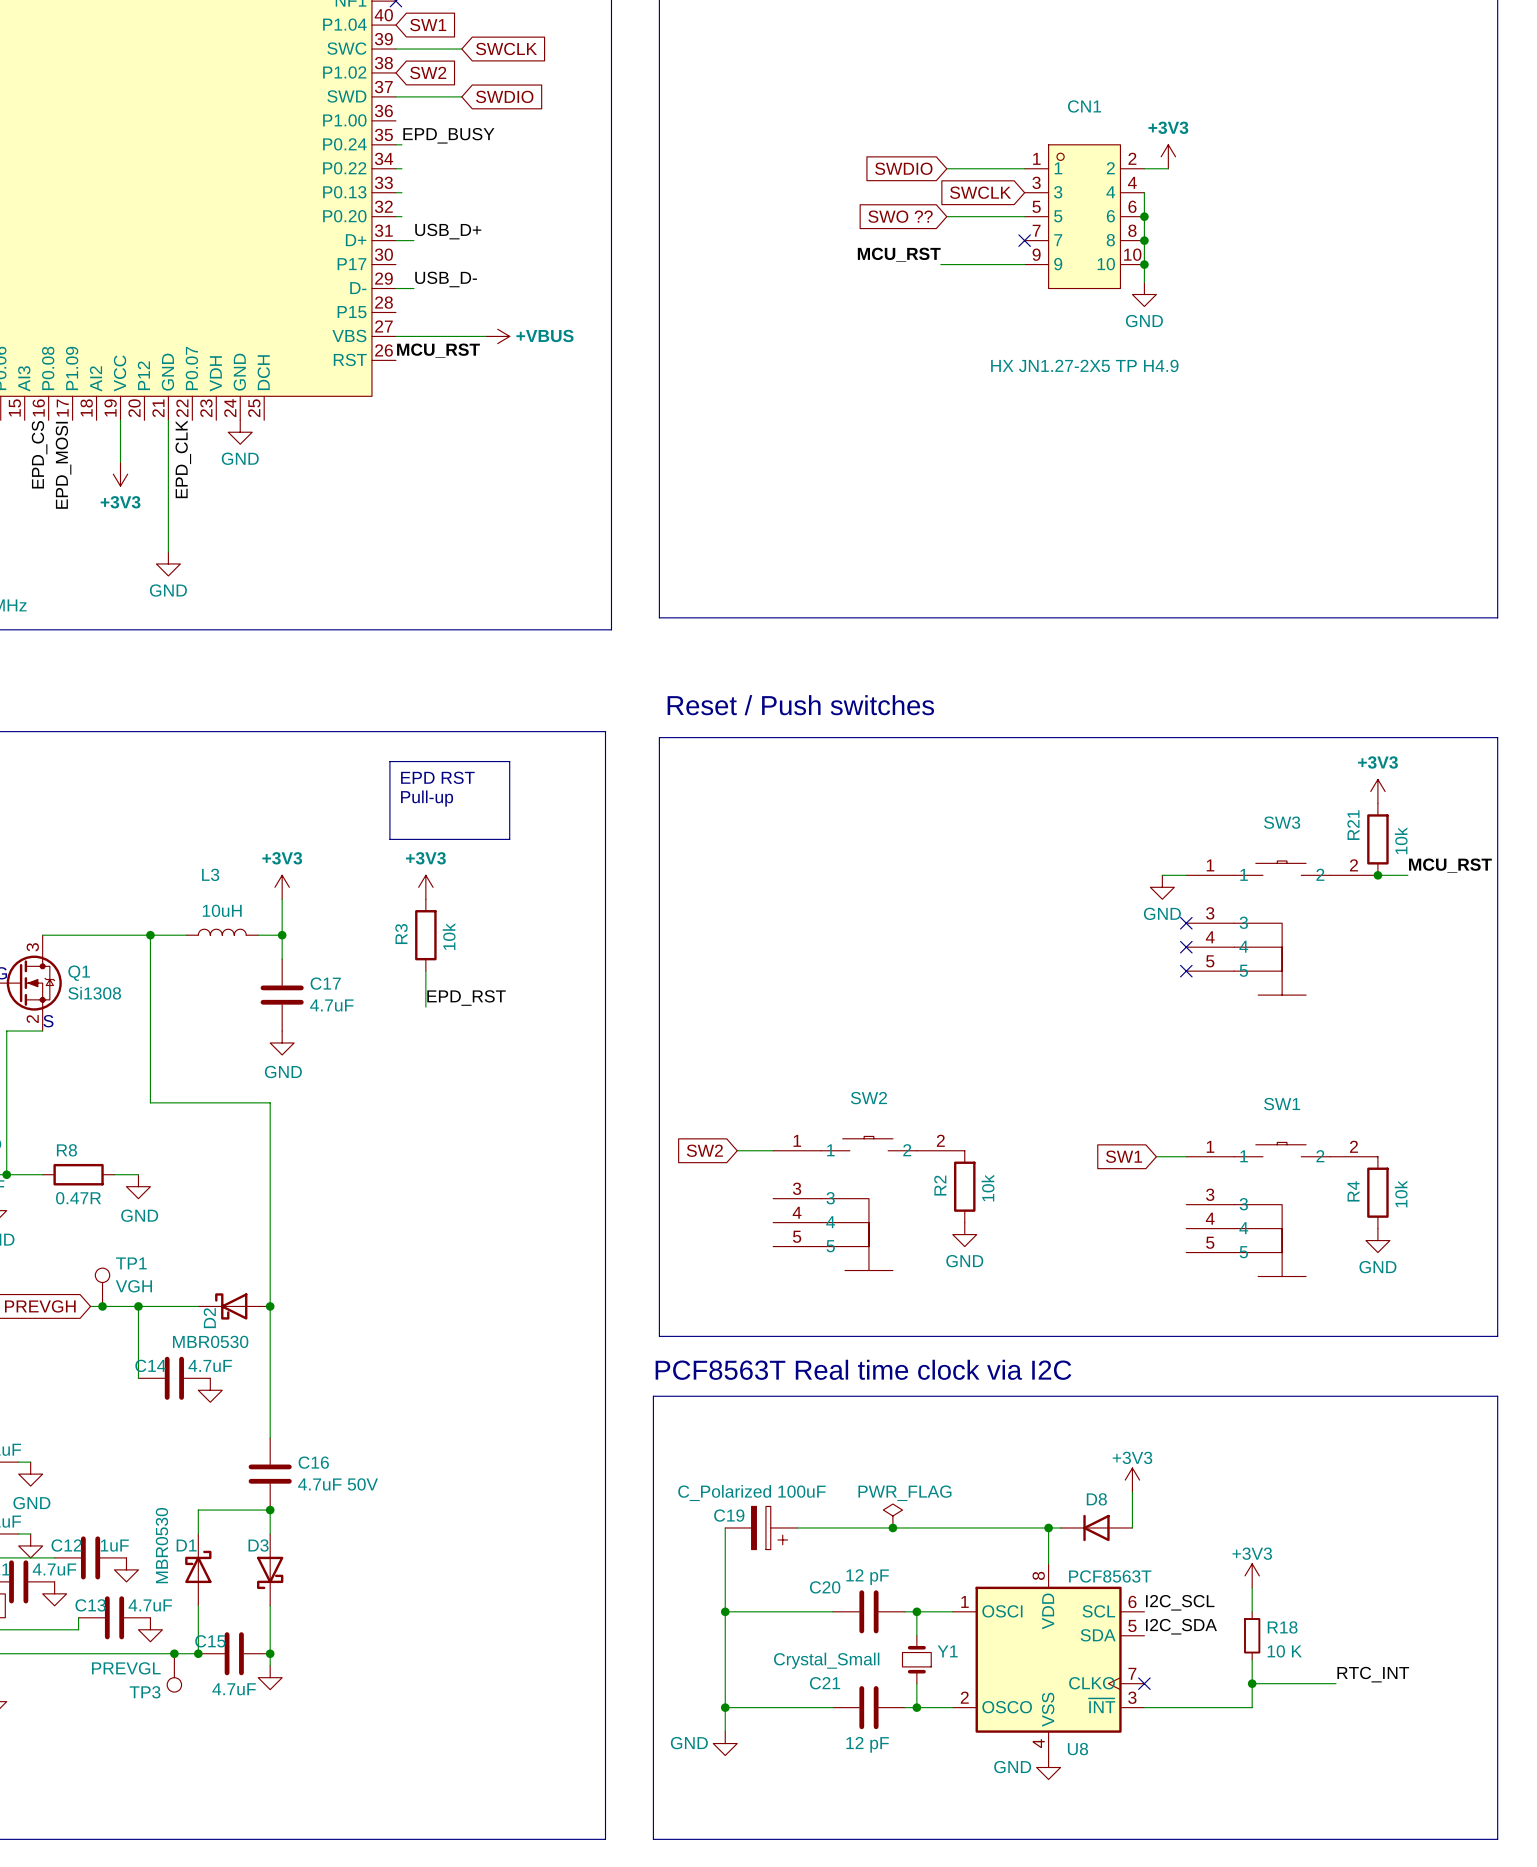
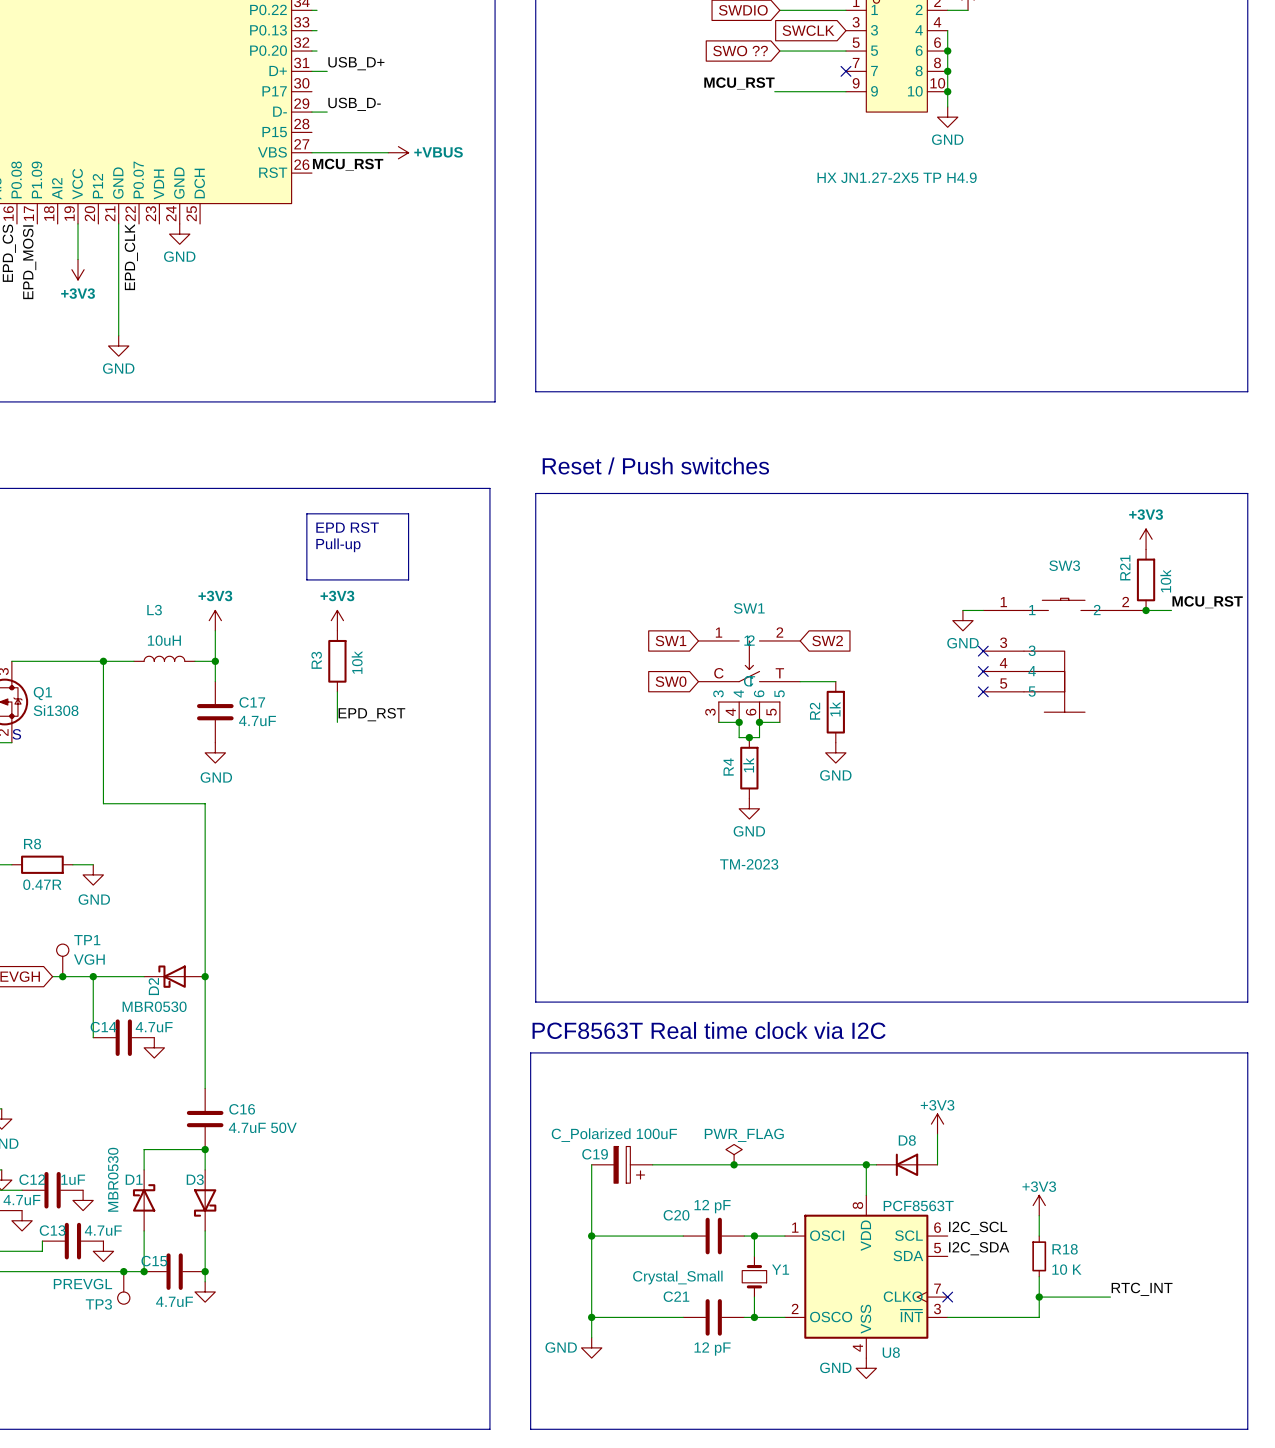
global label: none -> SW1 (670, 640)
global label: none -> SW2 (827, 640)
global label: none -> SW0 (671, 681)
wire: none -> (800, 681) (835, 681)
wire: none -> (718, 722) (739, 722) (739, 737) (759, 737) (759, 722) (779, 722)
junction: none -> (739, 722)
junction: none -> (759, 722)
junction: none -> (749, 737)
power symbol: none -> GND (835, 752)
SW1 name position: SW1 (1282, 1104) -> SW1 (749, 608)
power symbol: none -> GND (749, 808)
SW1 symbol: [1186, 1142, 1378, 1277] -> [698, 640, 801, 723]
global label: SW2 (704, 1150) -> none
wire: (737, 1150) (773, 1150) -> none
global label: SW1 (1124, 1156) -> none
wire: (1156, 1156) (1186, 1156) -> none
SW1 value: none -> TM-2023 (749, 864)
R2 position: (964, 1186) -> (835, 712)
R2 value: 10k (988, 1188) -> 1k (835, 709)
R4 position: (1377, 1192) -> (749, 768)
R4 value: 10k (1401, 1194) -> 1k (748, 765)
SW2: (868, 1203) -> none
power symbol: GND (964, 1234) -> none
power symbol: GND (1377, 1240) -> none

